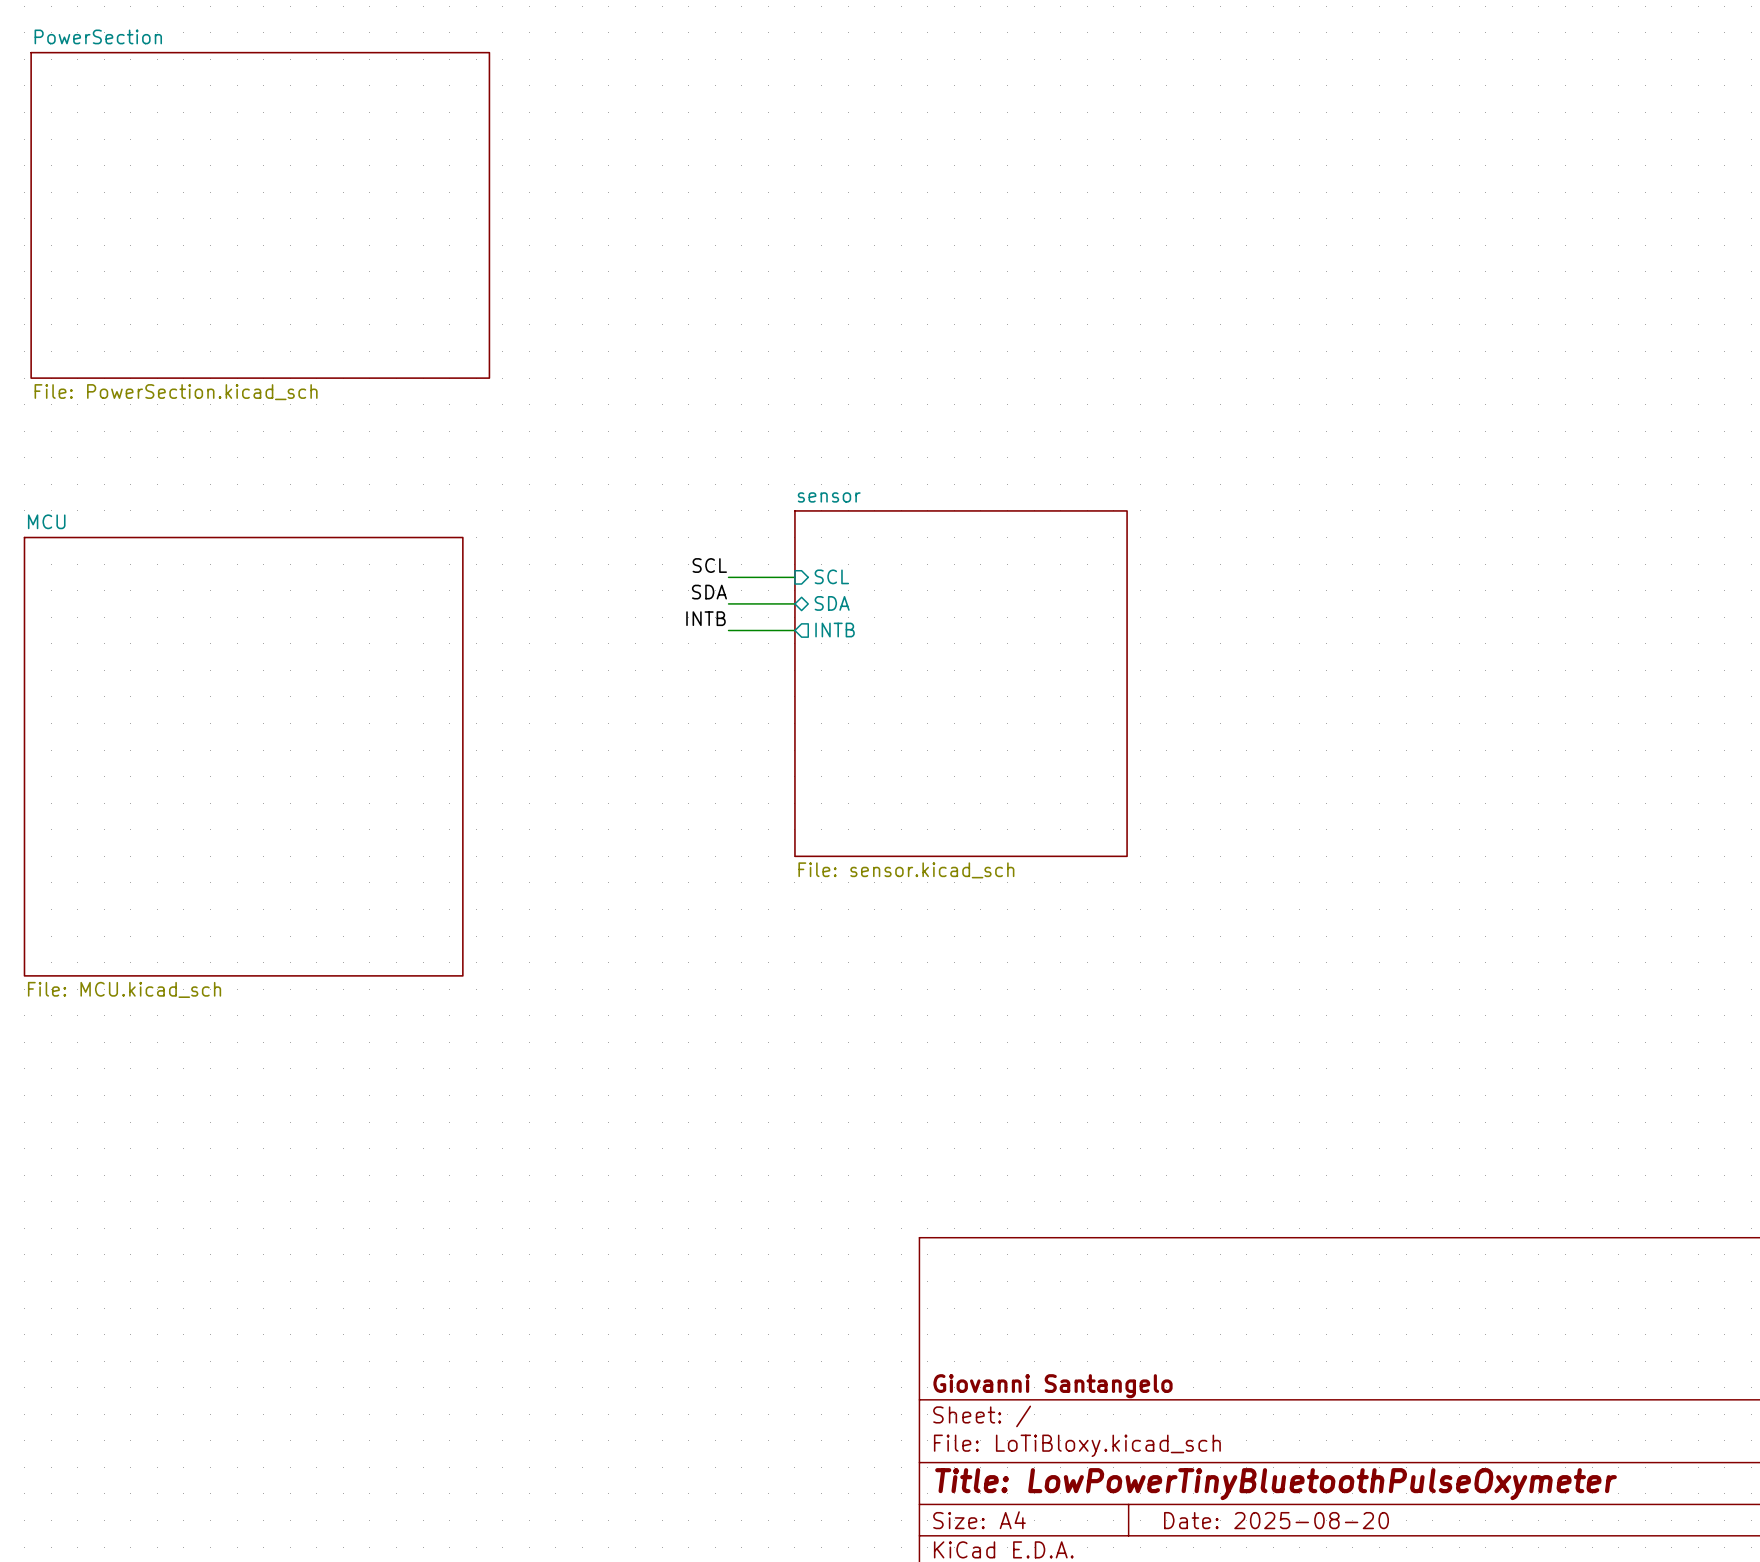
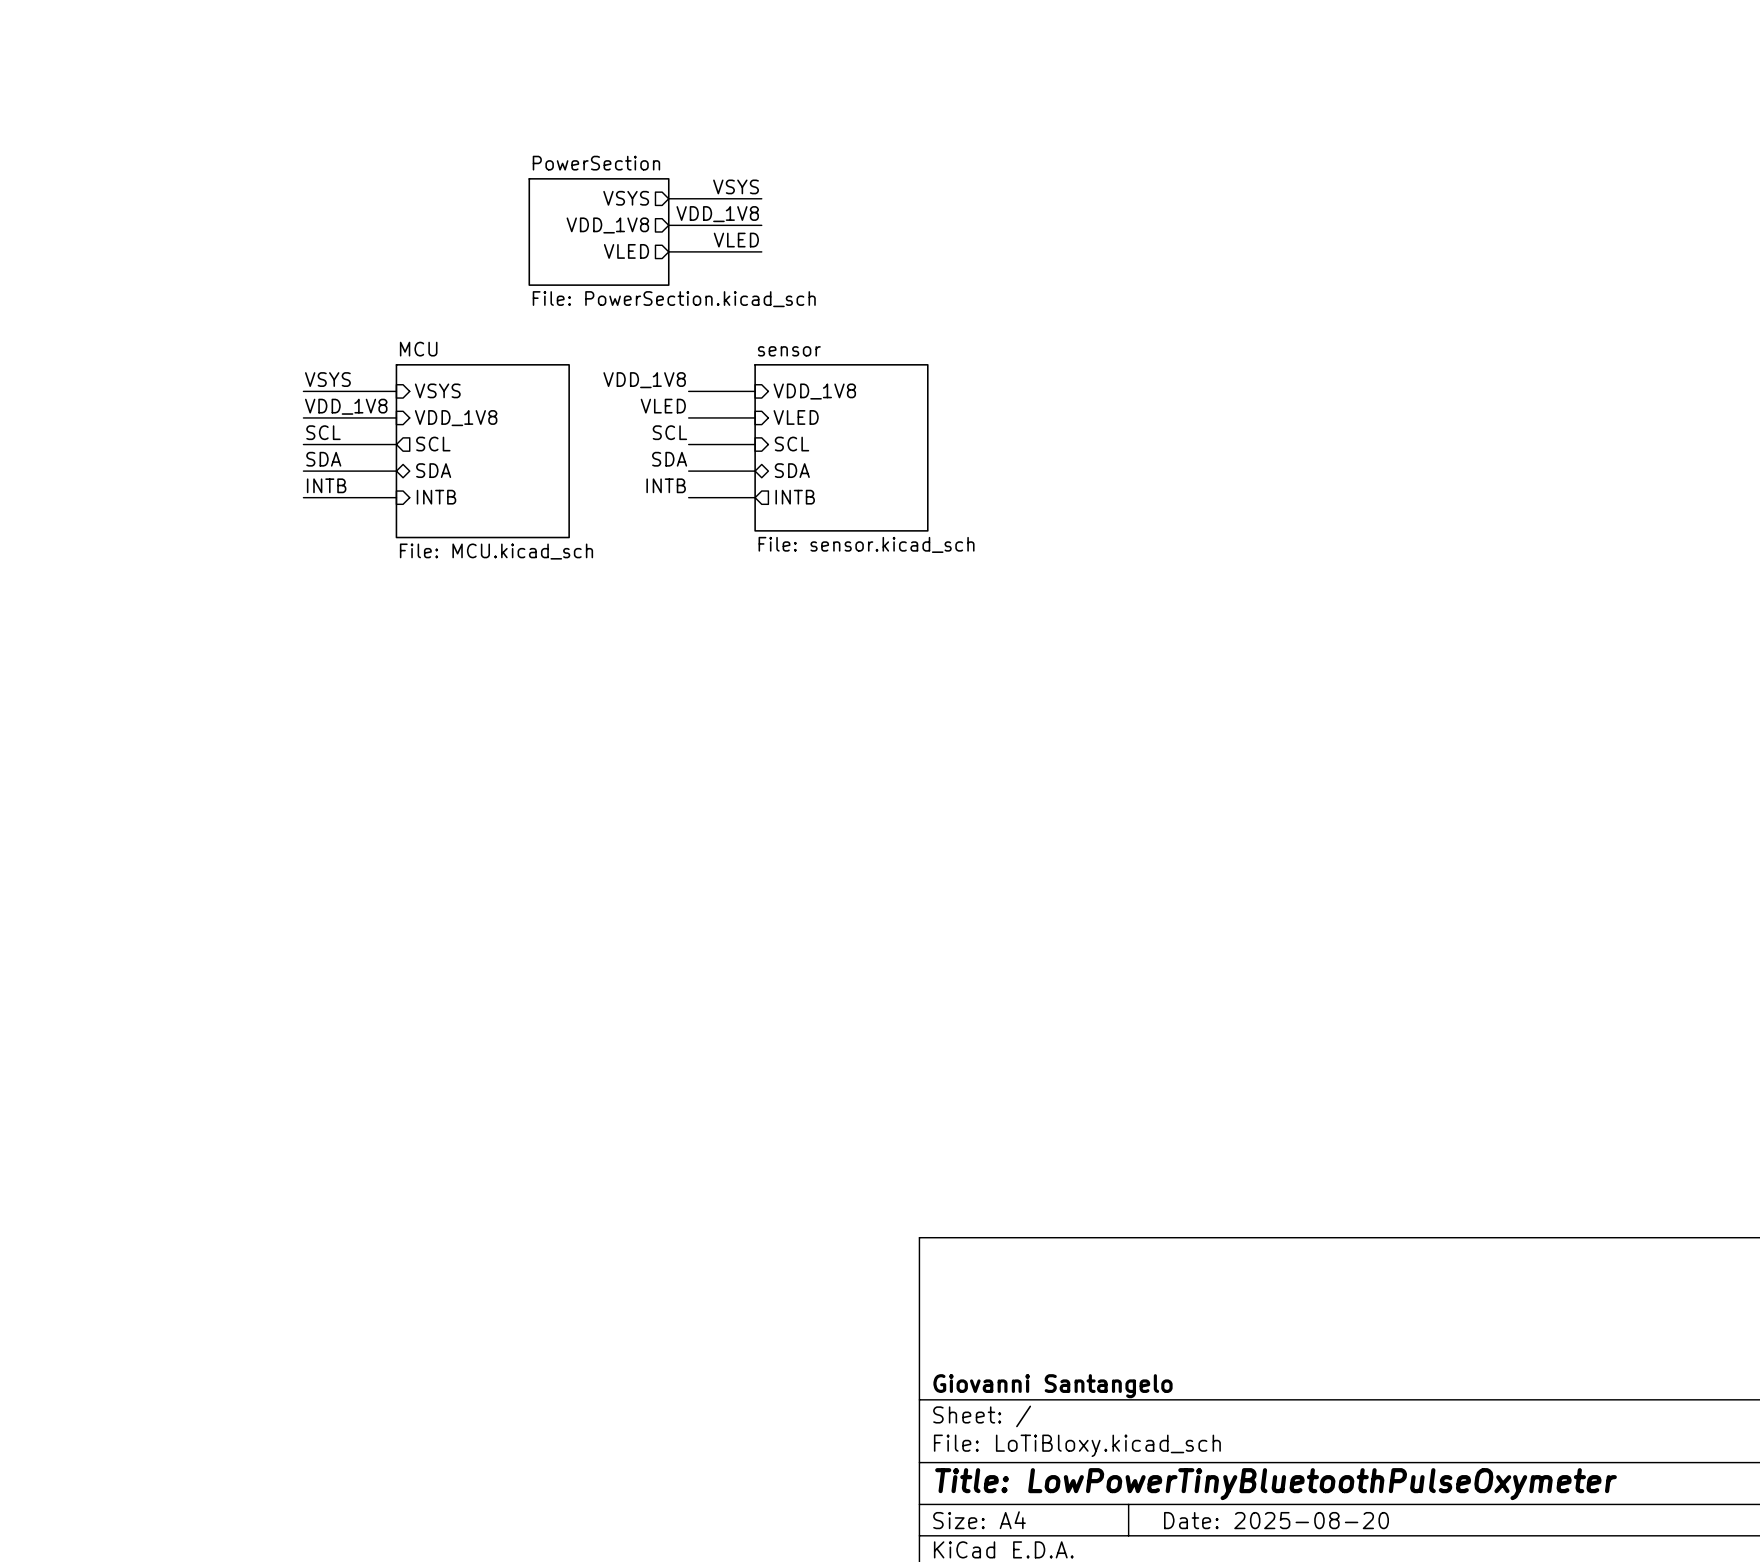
label: none -> VSYS (736, 186)
sheet pin: none -> VSYS (626, 198)
wire: none -> (668, 198) (761, 198)
label: none -> VDD_1V8 (717, 214)
sheet PowerSection: File: PowerSection.kicad_sch (260, 215) -> none
sheet pin: none -> VDD_1V8 (607, 225)
wire: none -> (668, 225) (761, 225)
sheet PowerSection: none -> File: PowerSection.kicad_sch (599, 231)
label: none -> VLED (736, 240)
sheet pin: none -> VLED (626, 251)
wire: none -> (668, 251) (761, 251)
label: none -> VSYS (327, 379)
label: none -> VDD_1V8 (644, 380)
sheet pin: none -> VSYS (437, 390)
wire: none -> (303, 391) (396, 391)
wire: none -> (688, 391) (755, 391)
sheet pin: none -> VDD_1V8 (814, 391)
label: none -> VDD_1V8 (346, 406)
label: none -> VLED (663, 406)
wire: none -> (303, 417) (396, 417)
wire: none -> (688, 417) (755, 417)
sheet pin: none -> VLED (796, 417)
sheet pin: none -> VDD_1V8 (456, 418)
label: none -> SCL (323, 432)
wire: none -> (303, 444) (396, 444)
sheet pin: none -> SCL (433, 444)
sheet sensor: none -> File: sensor.kicad_sch (841, 447)
sheet MCU: none -> File: MCU.kicad_sch (482, 451)
label: none -> SDA (323, 459)
sheet pin: none -> SDA (433, 470)
wire: none -> (303, 471) (396, 471)
label: none -> INTB (326, 485)
wire: none -> (303, 497) (396, 497)
sheet pin: none -> INTB (436, 497)
label position: SCL (709, 565) -> SCL (669, 432)
sheet pin position: SCL (831, 576) -> SCL (792, 444)
wire: (728, 577) (794, 577) -> (688, 444) (755, 444)
label position: SDA (709, 592) -> SDA (669, 459)
wire: (728, 603) (794, 603) -> (688, 471) (755, 471)
sheet pin position: SDA (832, 603) -> SDA (792, 470)
label position: INTB (705, 618) -> INTB (666, 485)
wire: (728, 630) (794, 630) -> (688, 497) (755, 497)
sheet pin position: INTB (835, 630) -> INTB (795, 497)
sheet sensor: File: sensor.kicad_sch (961, 683) -> none
sheet MCU: File: MCU.kicad_sch (243, 756) -> none

